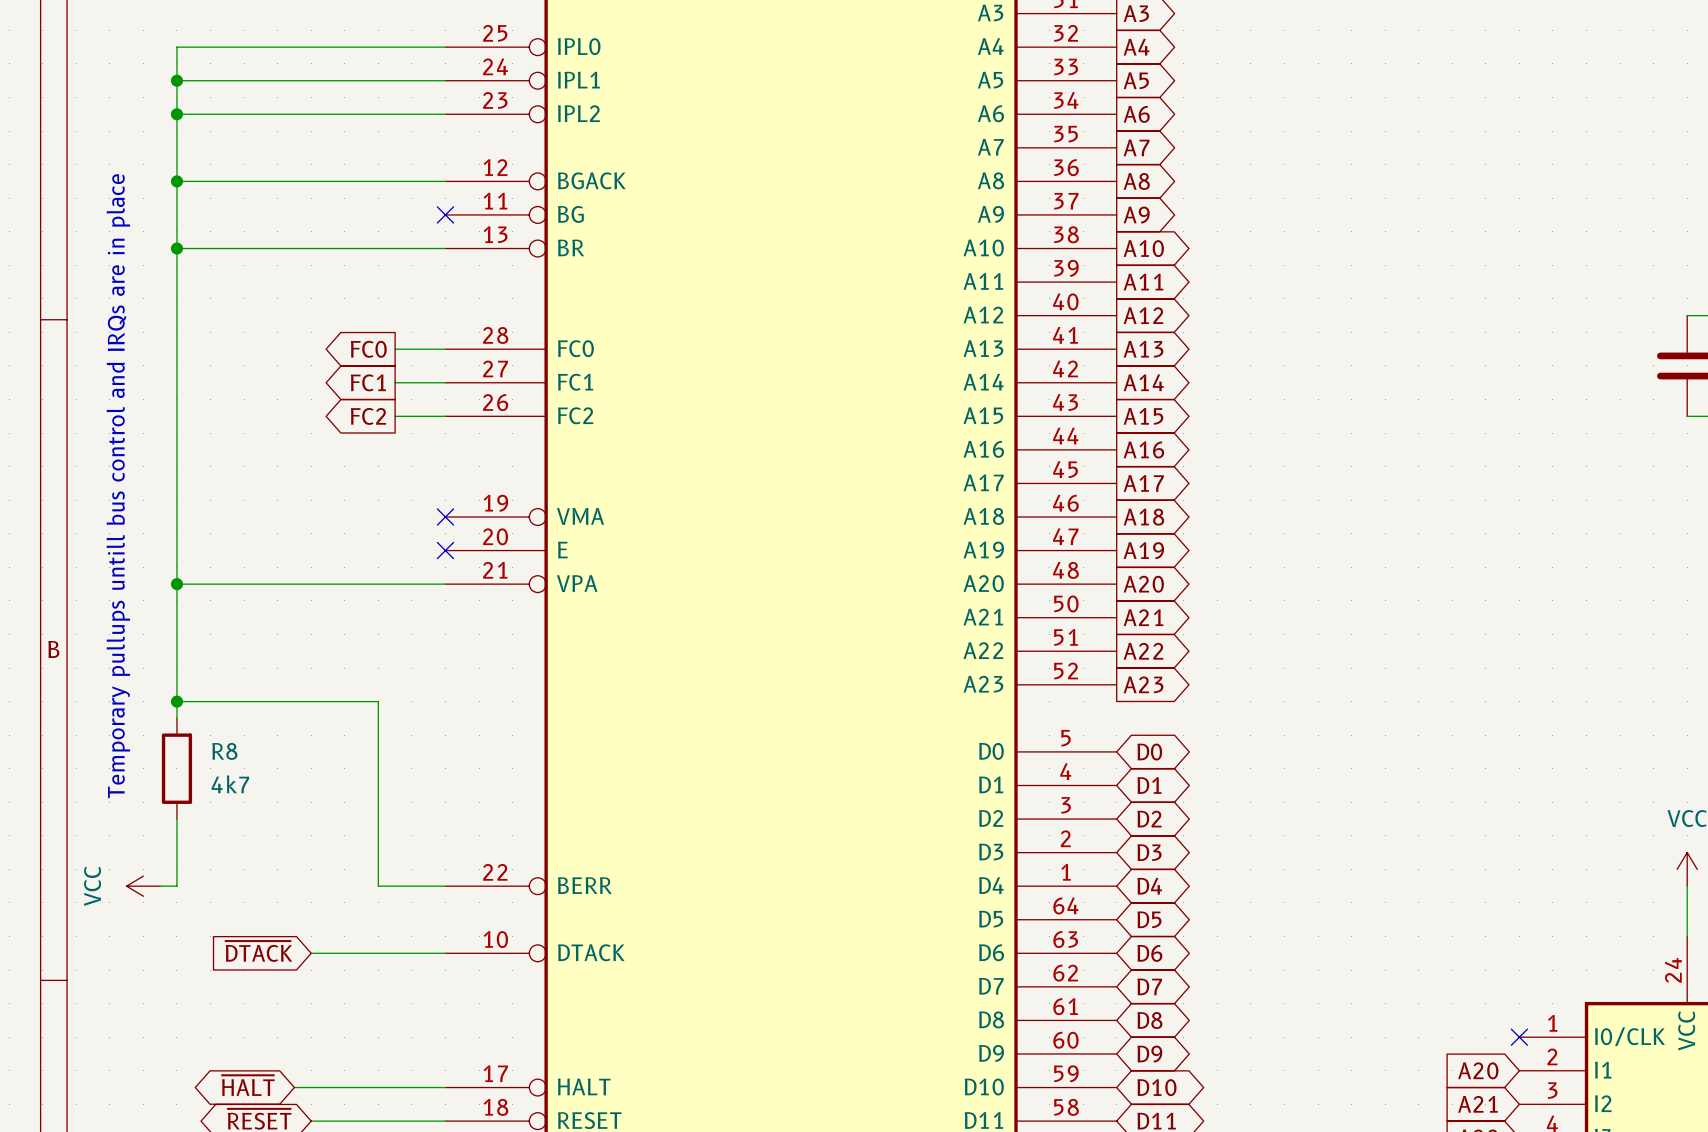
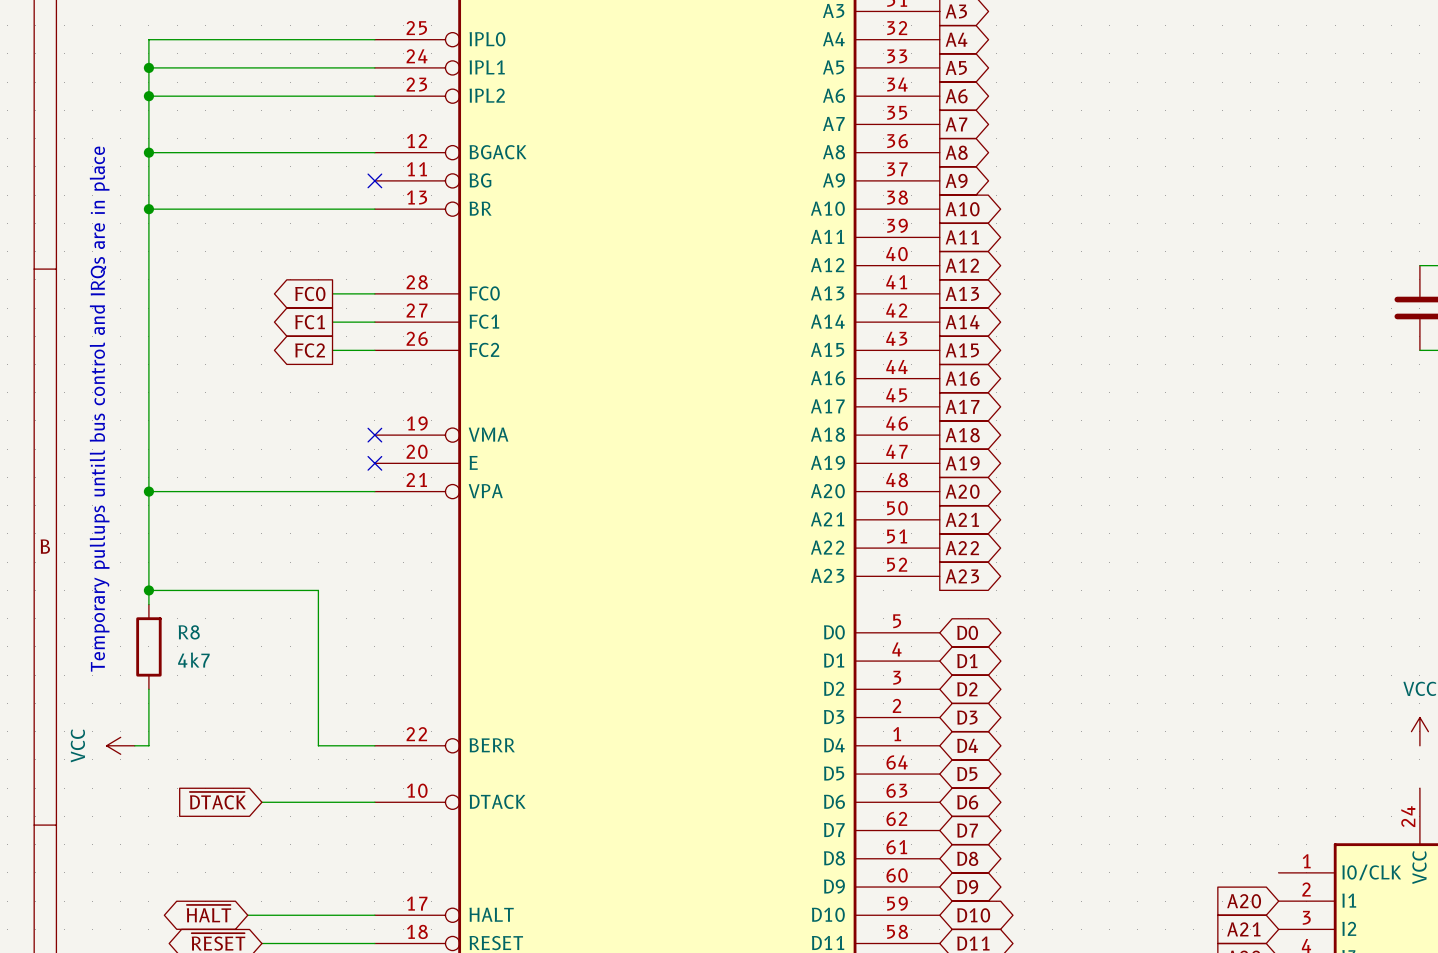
wire: (1687, 886) (1687, 936) -> none
no-connect mark: (1519, 1037) -> none

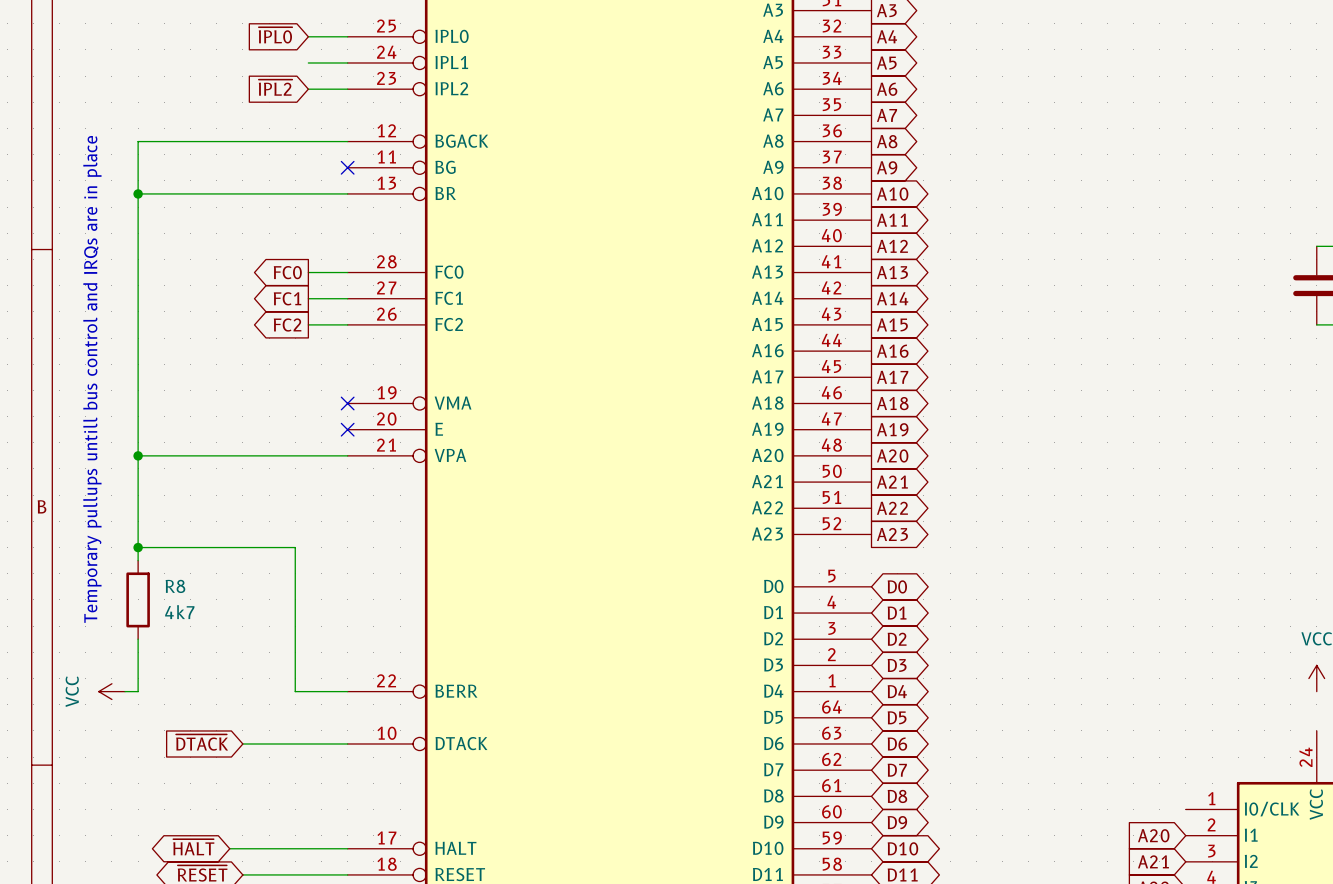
global label: none -> ~{IPL0} (275, 35)
wire: (332, 39) (148, 39) (148, 152) -> none
wire: (148, 67) (332, 67) -> none
junction: (148, 67) -> none
global label: none -> ~{IPL2} (275, 87)
wire: (148, 96) (332, 96) -> none
junction: (148, 96) -> none
junction: (148, 152) -> none

